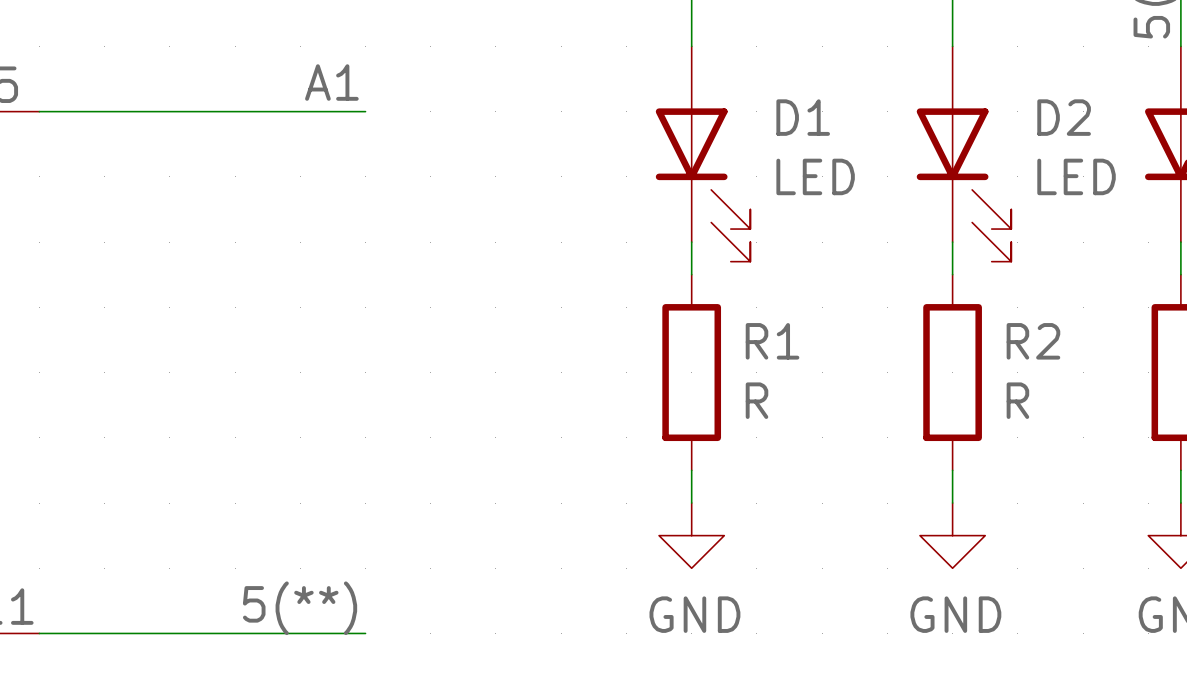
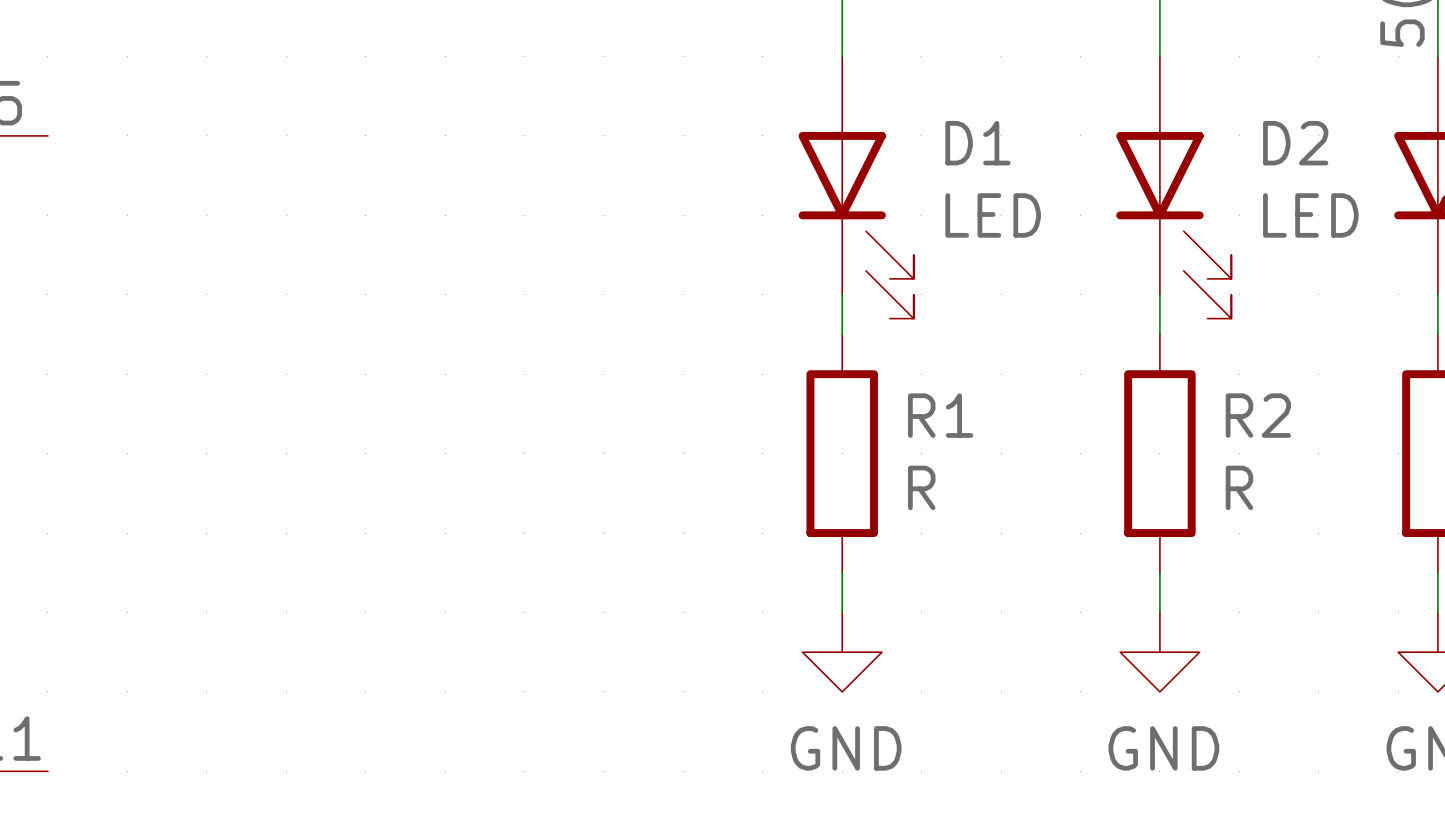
label: A1 (331, 82) -> none
wire: (39, 111) (365, 111) -> none
label: 5(**) (300, 608) -> none
wire: (39, 633) (365, 633) -> none

